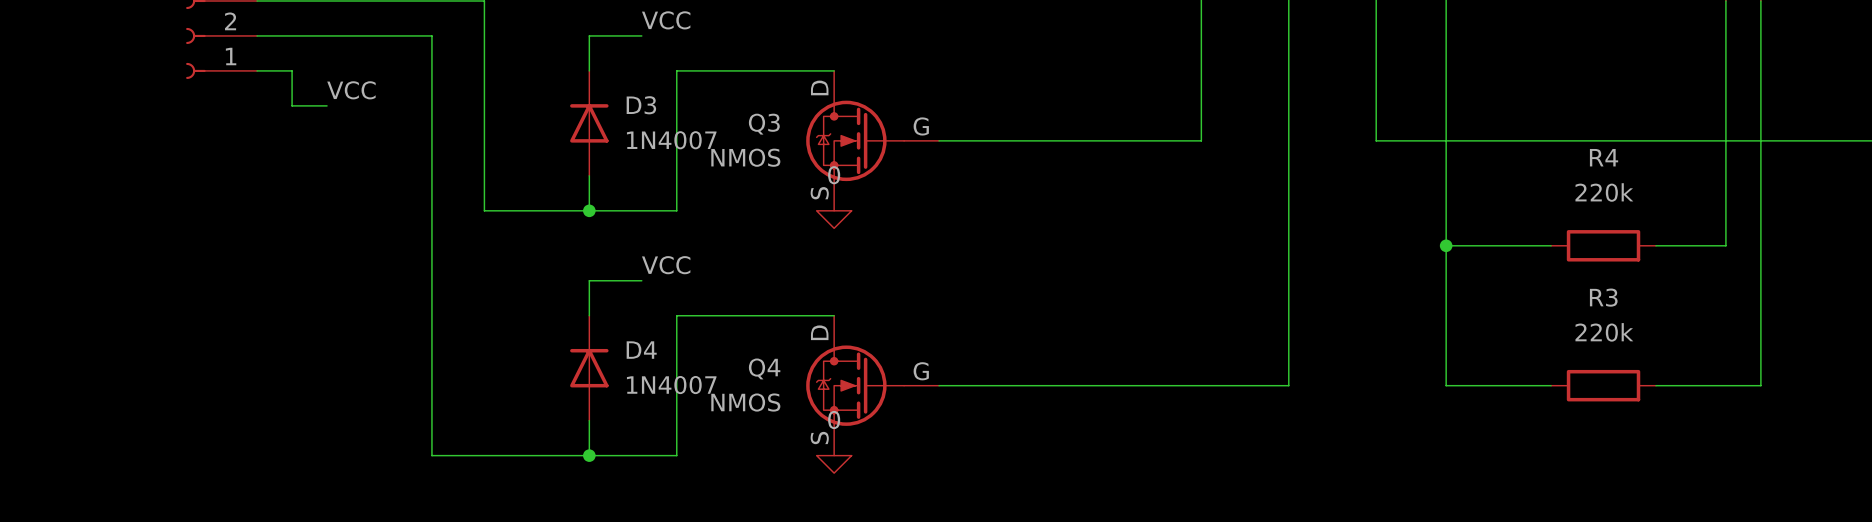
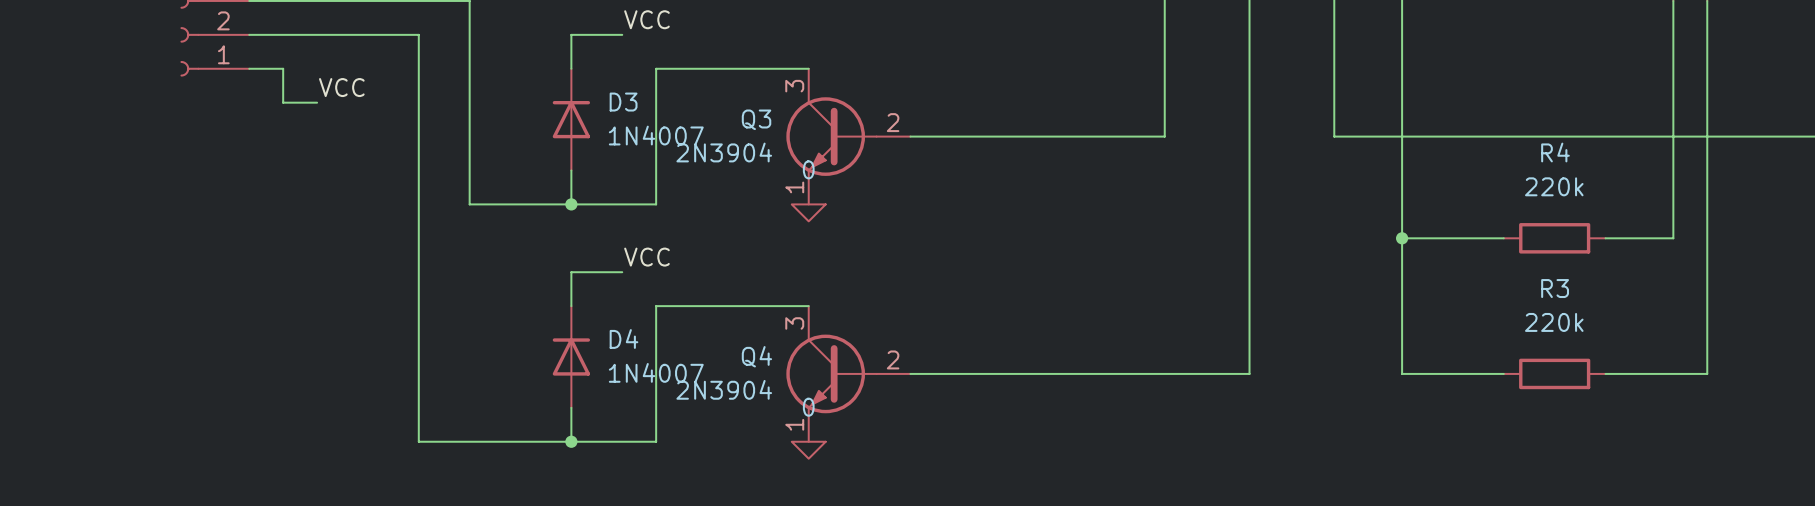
Q3 symbol: [806, 70, 940, 211] -> [786, 68, 911, 205]
Q3 value: NMOS (745, 157) -> 2N3904 (724, 152)
Q4 symbol: [806, 315, 940, 456] -> [786, 306, 911, 442]
Q4 value: NMOS (745, 402) -> 2N3904 (724, 389)

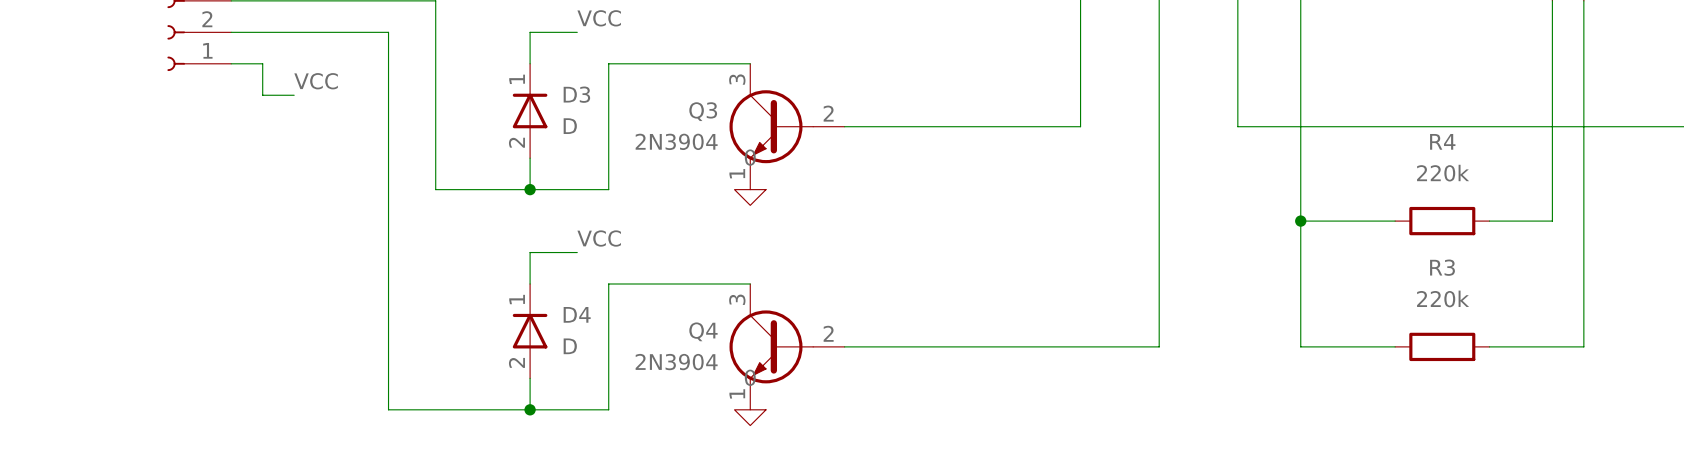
D3 pin number: none -> 1 (517, 79)
D3 value: 1N4007 (656, 135) -> D (570, 126)
D3 pin number: none -> 2 (516, 142)
D4 pin number: none -> 1 (517, 299)
D4 value: 1N4007 (656, 372) -> D (570, 346)
D4 pin number: none -> 2 (516, 362)

